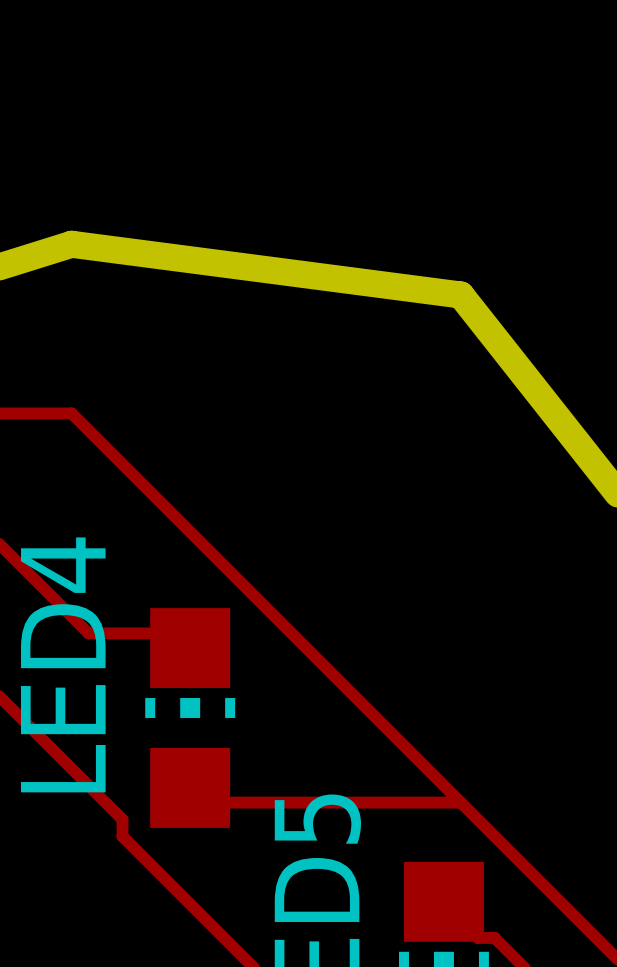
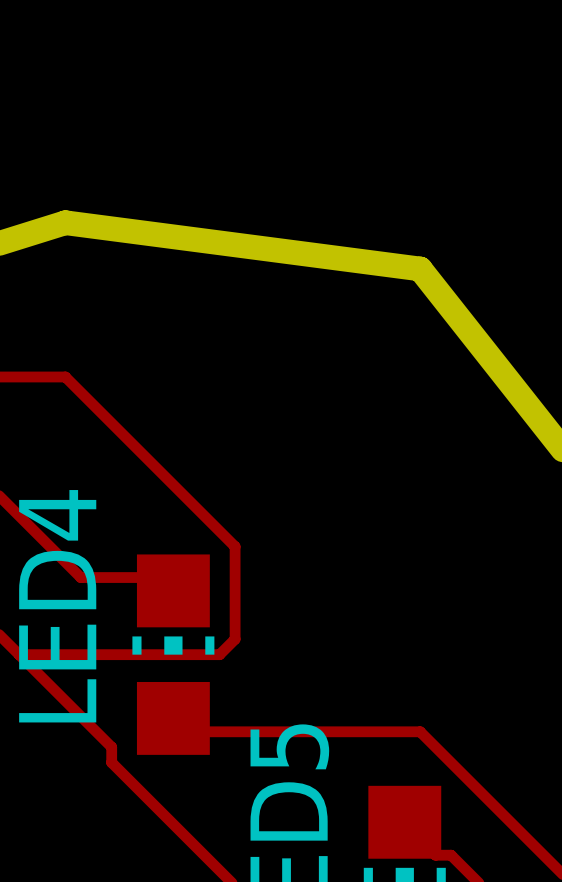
track: (257, 599) (460, 802) -> (235, 546) (235, 639) (219, 654) (19, 654)

